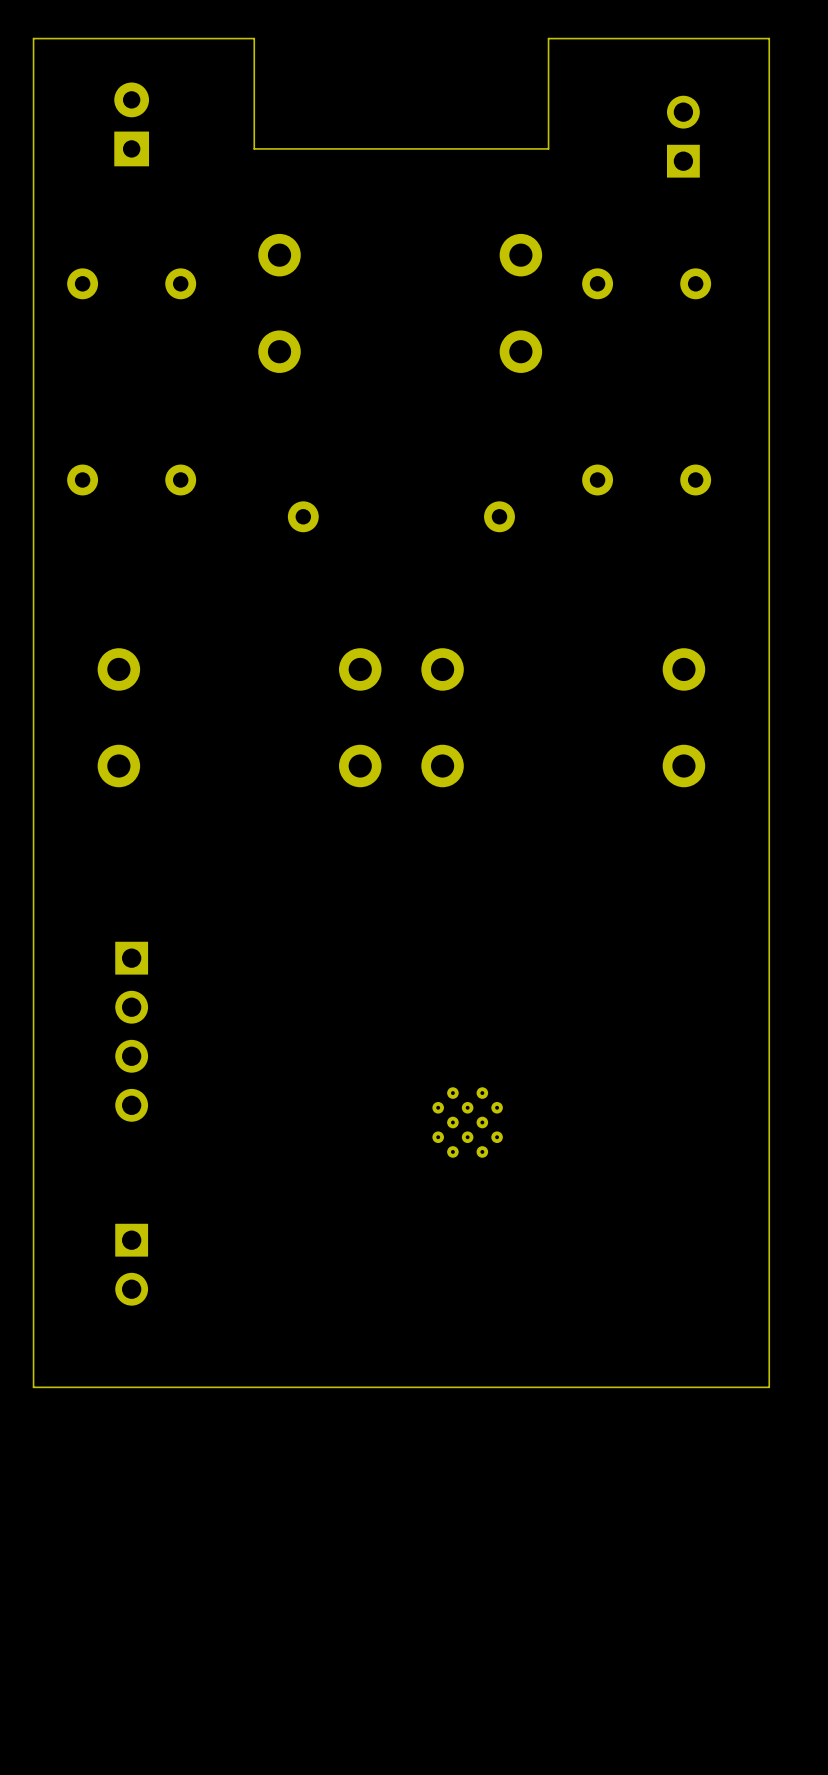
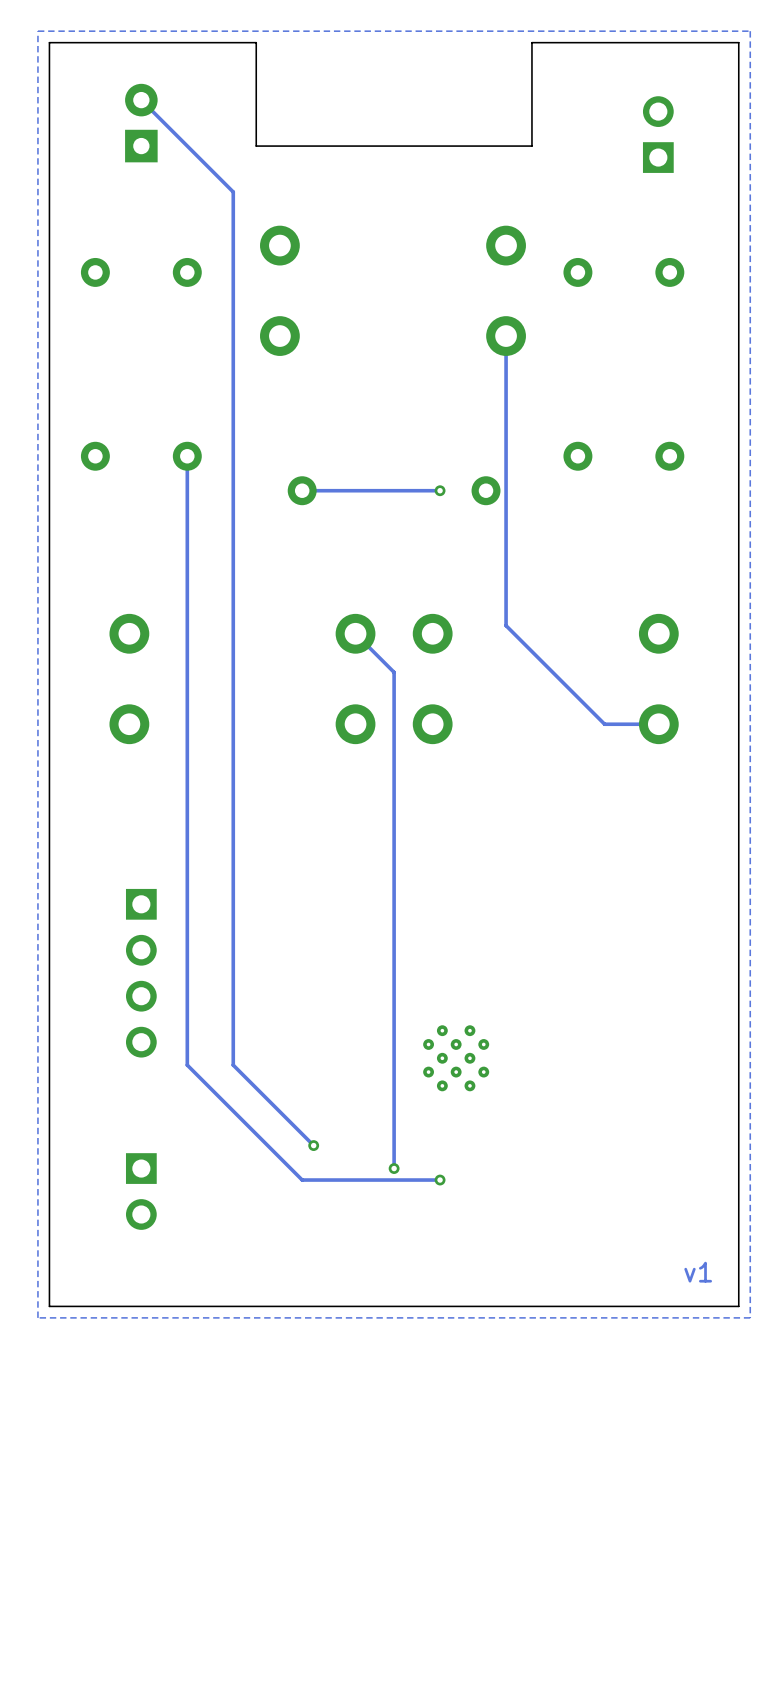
zone outline: none -> (750, 31) (750, 1317) (37, 1317) (37, 31) (750, 31)
track: none -> (141, 100) (233, 192) (233, 1065) (313, 1145)
track: none -> (506, 336) (506, 625) (604, 724) (658, 724)
track: none -> (187, 456) (187, 1065) (302, 1180) (440, 1180)
track: none -> (440, 490) (302, 490)
via: none -> (440, 490)
track: none -> (355, 633) (394, 672) (394, 1168)
via: none -> (313, 1145)
via: none -> (394, 1168)
via: none -> (440, 1180)
text: none -> v1 (698, 1272)

